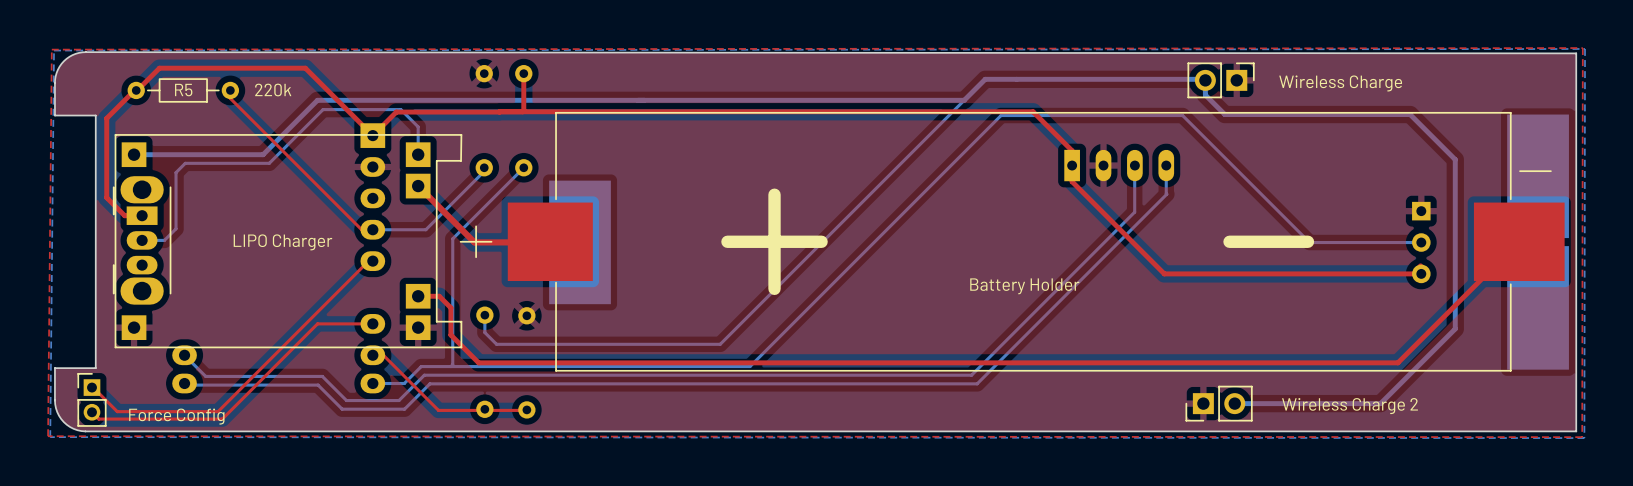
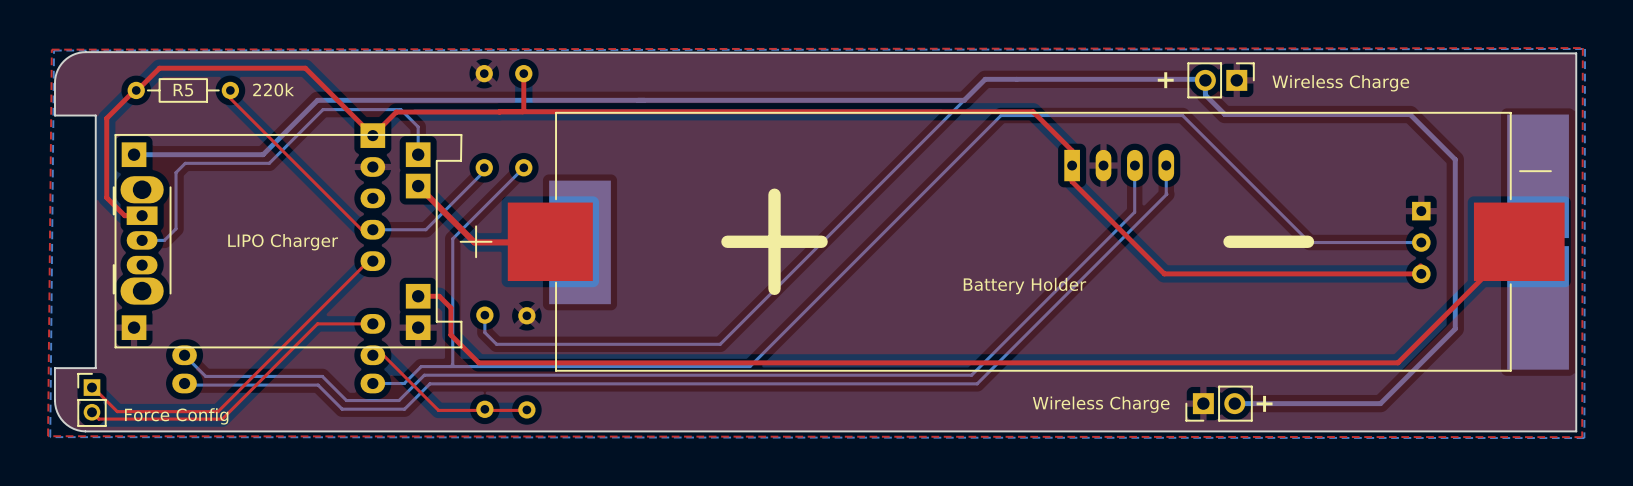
text: none -> + (1165, 80)
text: none -> + (1264, 403)
part value: Wireless Charge 2 (1350, 406) -> Wireless Charge (1101, 404)

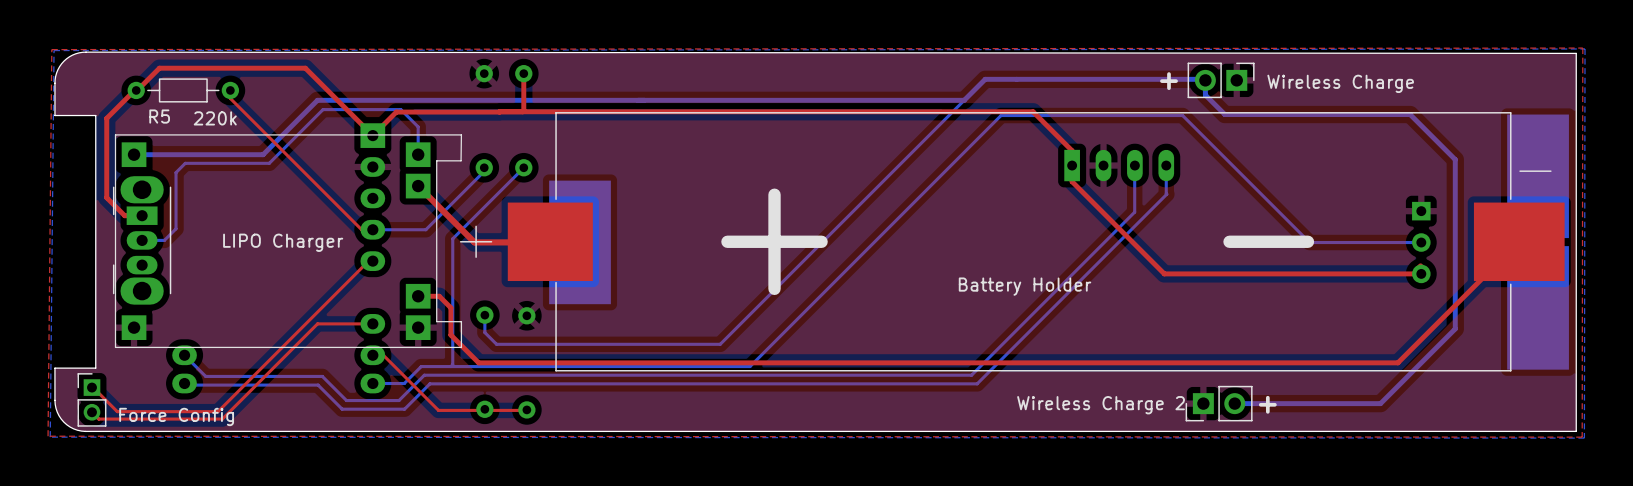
R5 value position: 220k (273, 89) -> 220k (215, 118)
R5 name position: R5 (183, 90) -> R5 (159, 116)
part value: Wireless Charge (1101, 404) -> Wireless Charge 2 (1101, 405)

